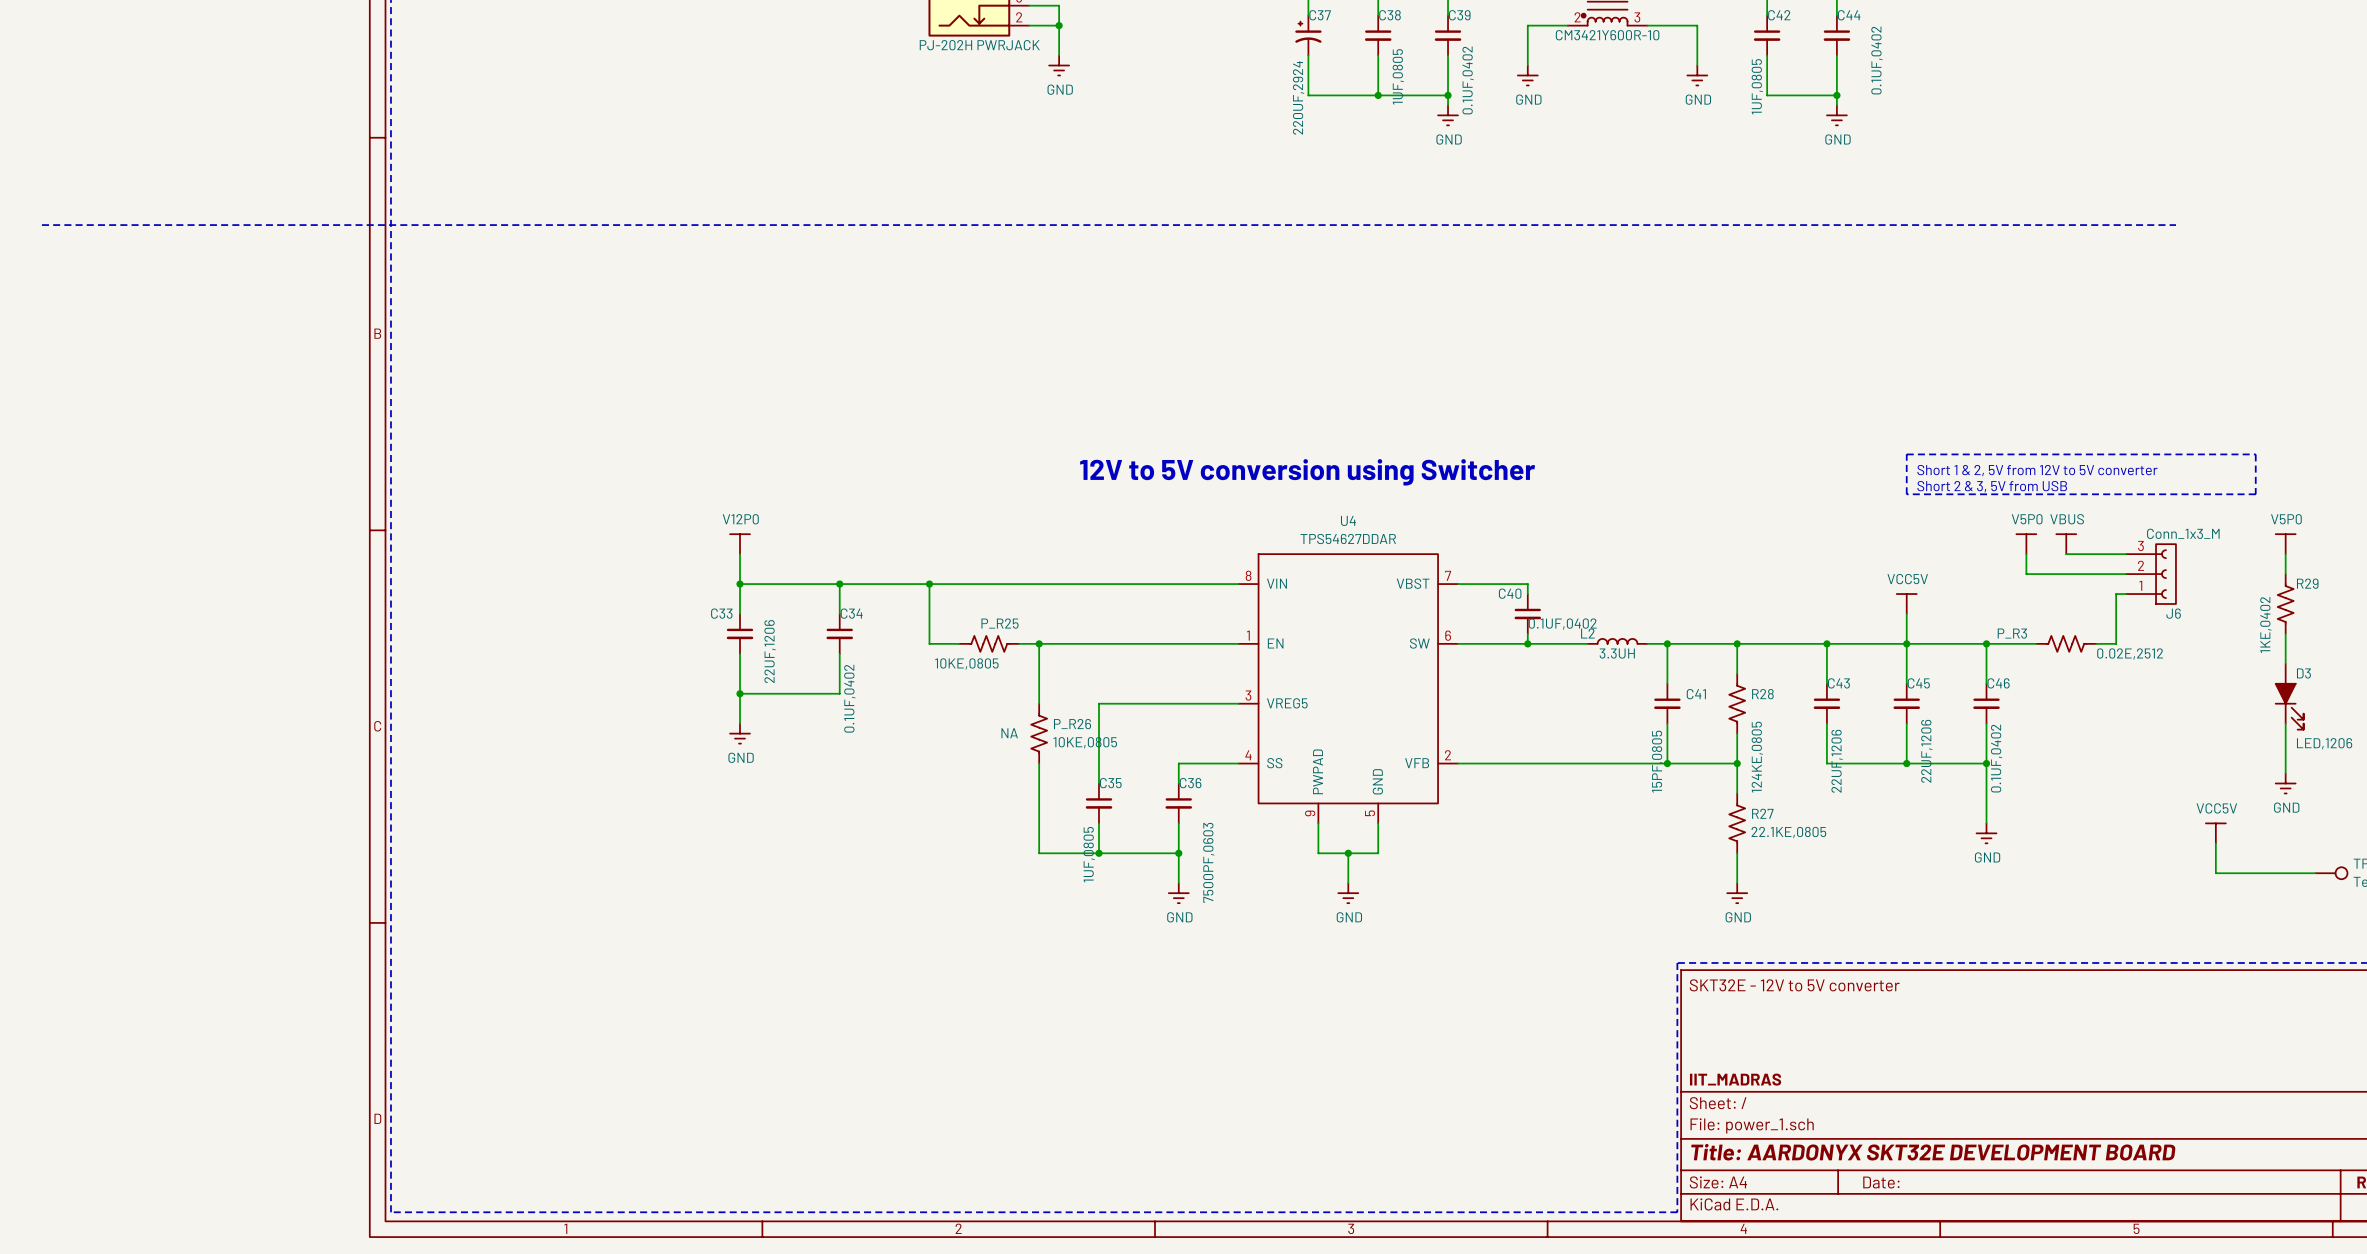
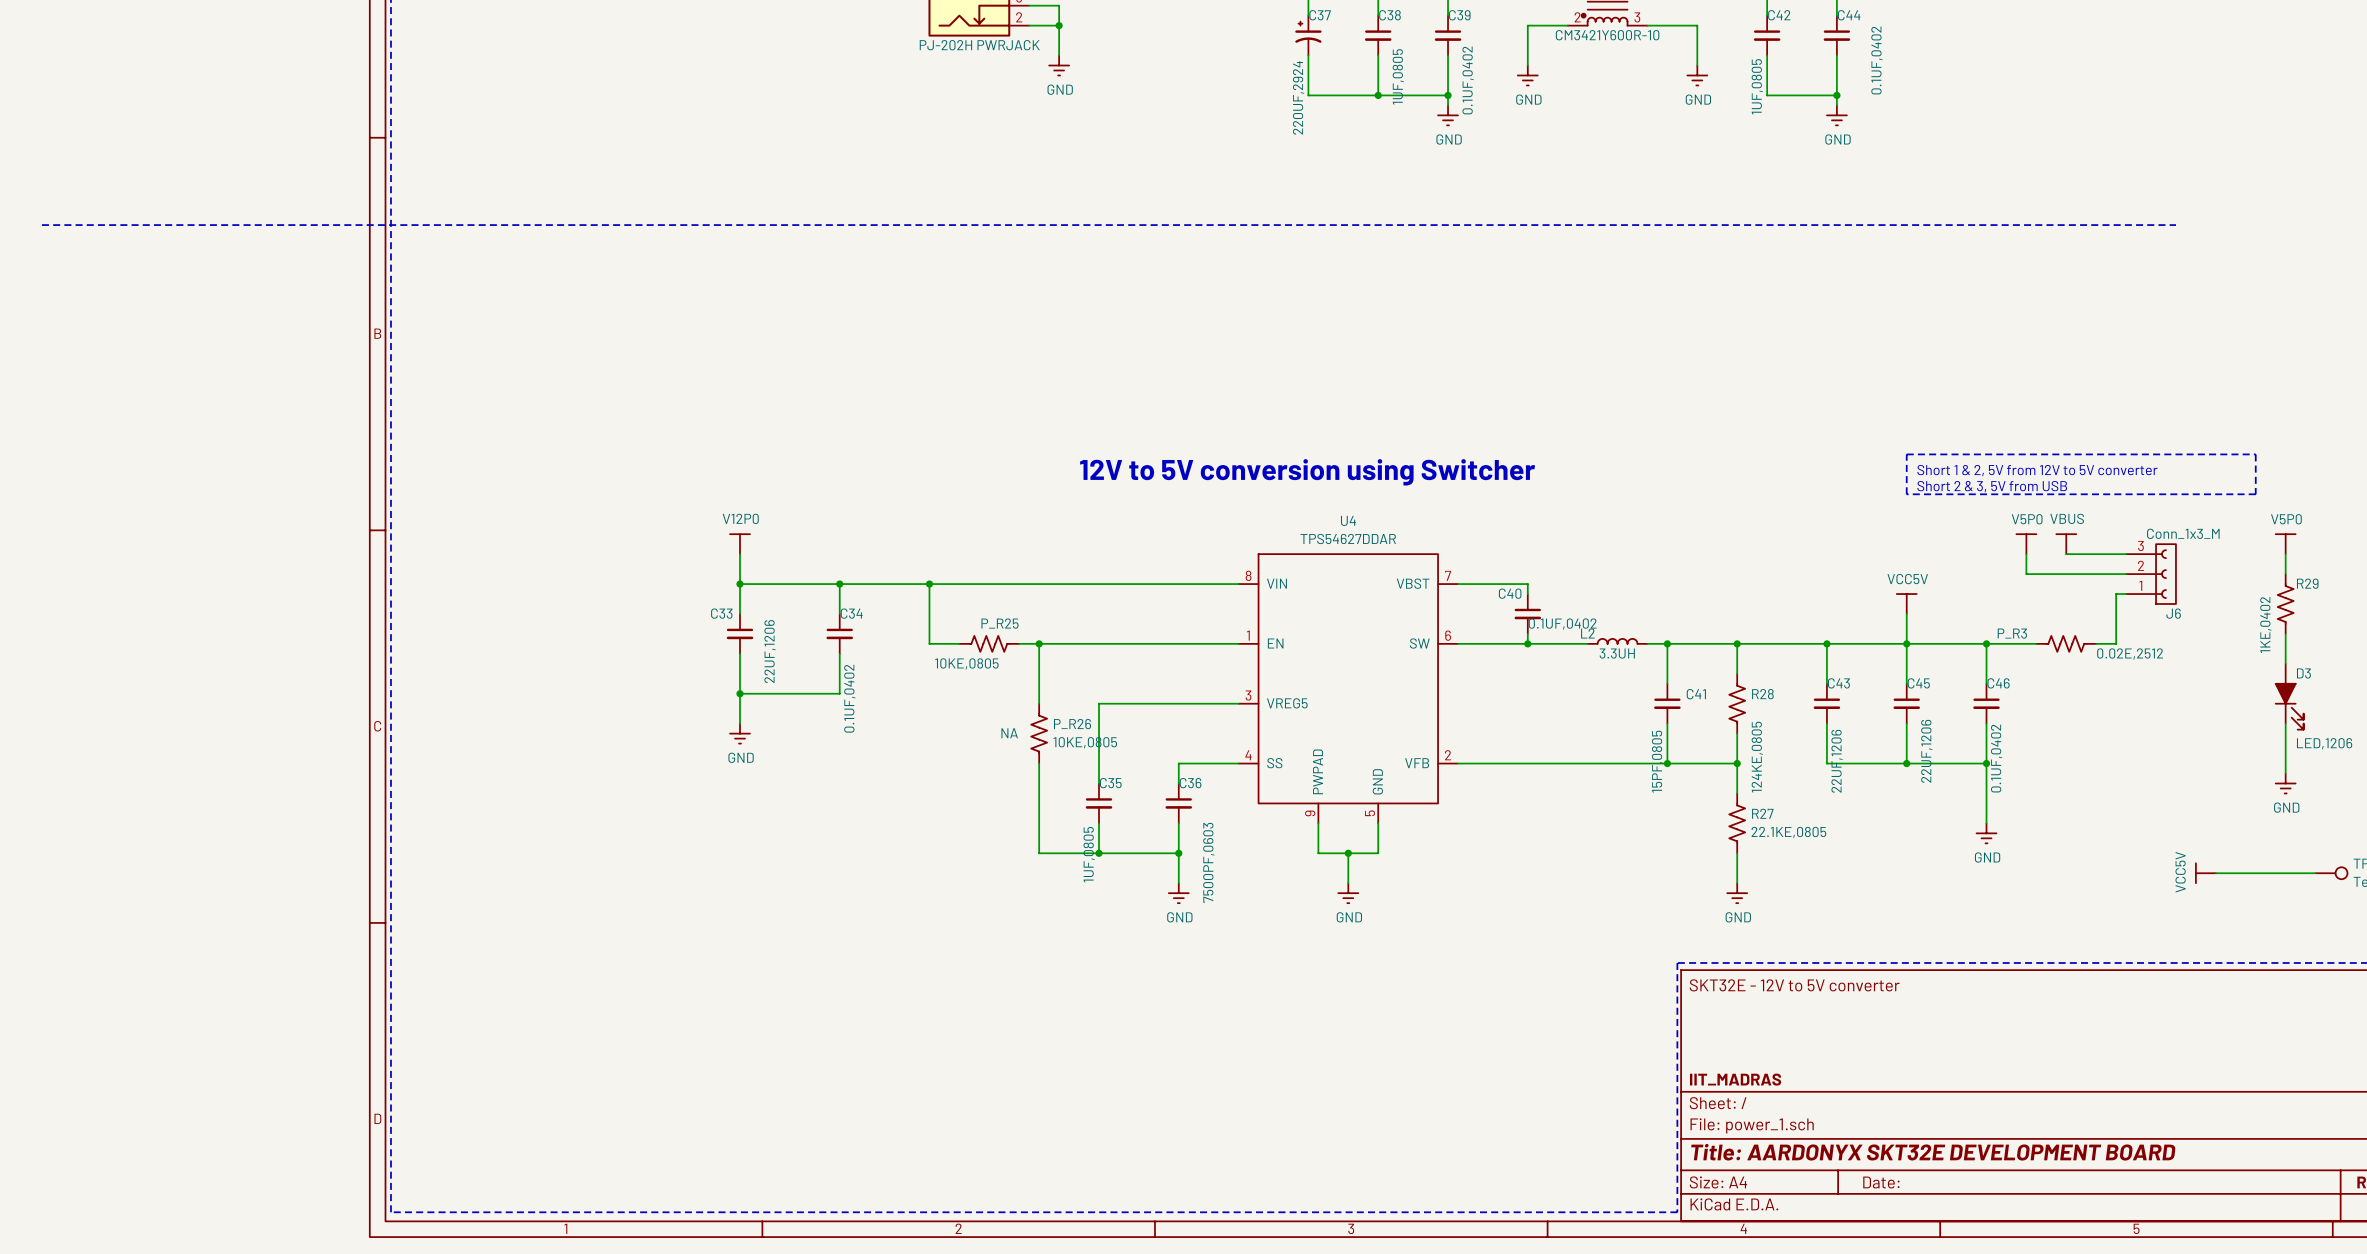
power symbol shape: [730, 534, 750, 555] -> [730, 534, 750, 555]
power symbol shape: [2056, 534, 2077, 555] -> [2056, 534, 2077, 555]
power symbol: VCC5V (2215, 833) -> none
wire: (2215, 843) (2215, 873) -> none
power symbol: none -> VCC5V (2205, 873)

